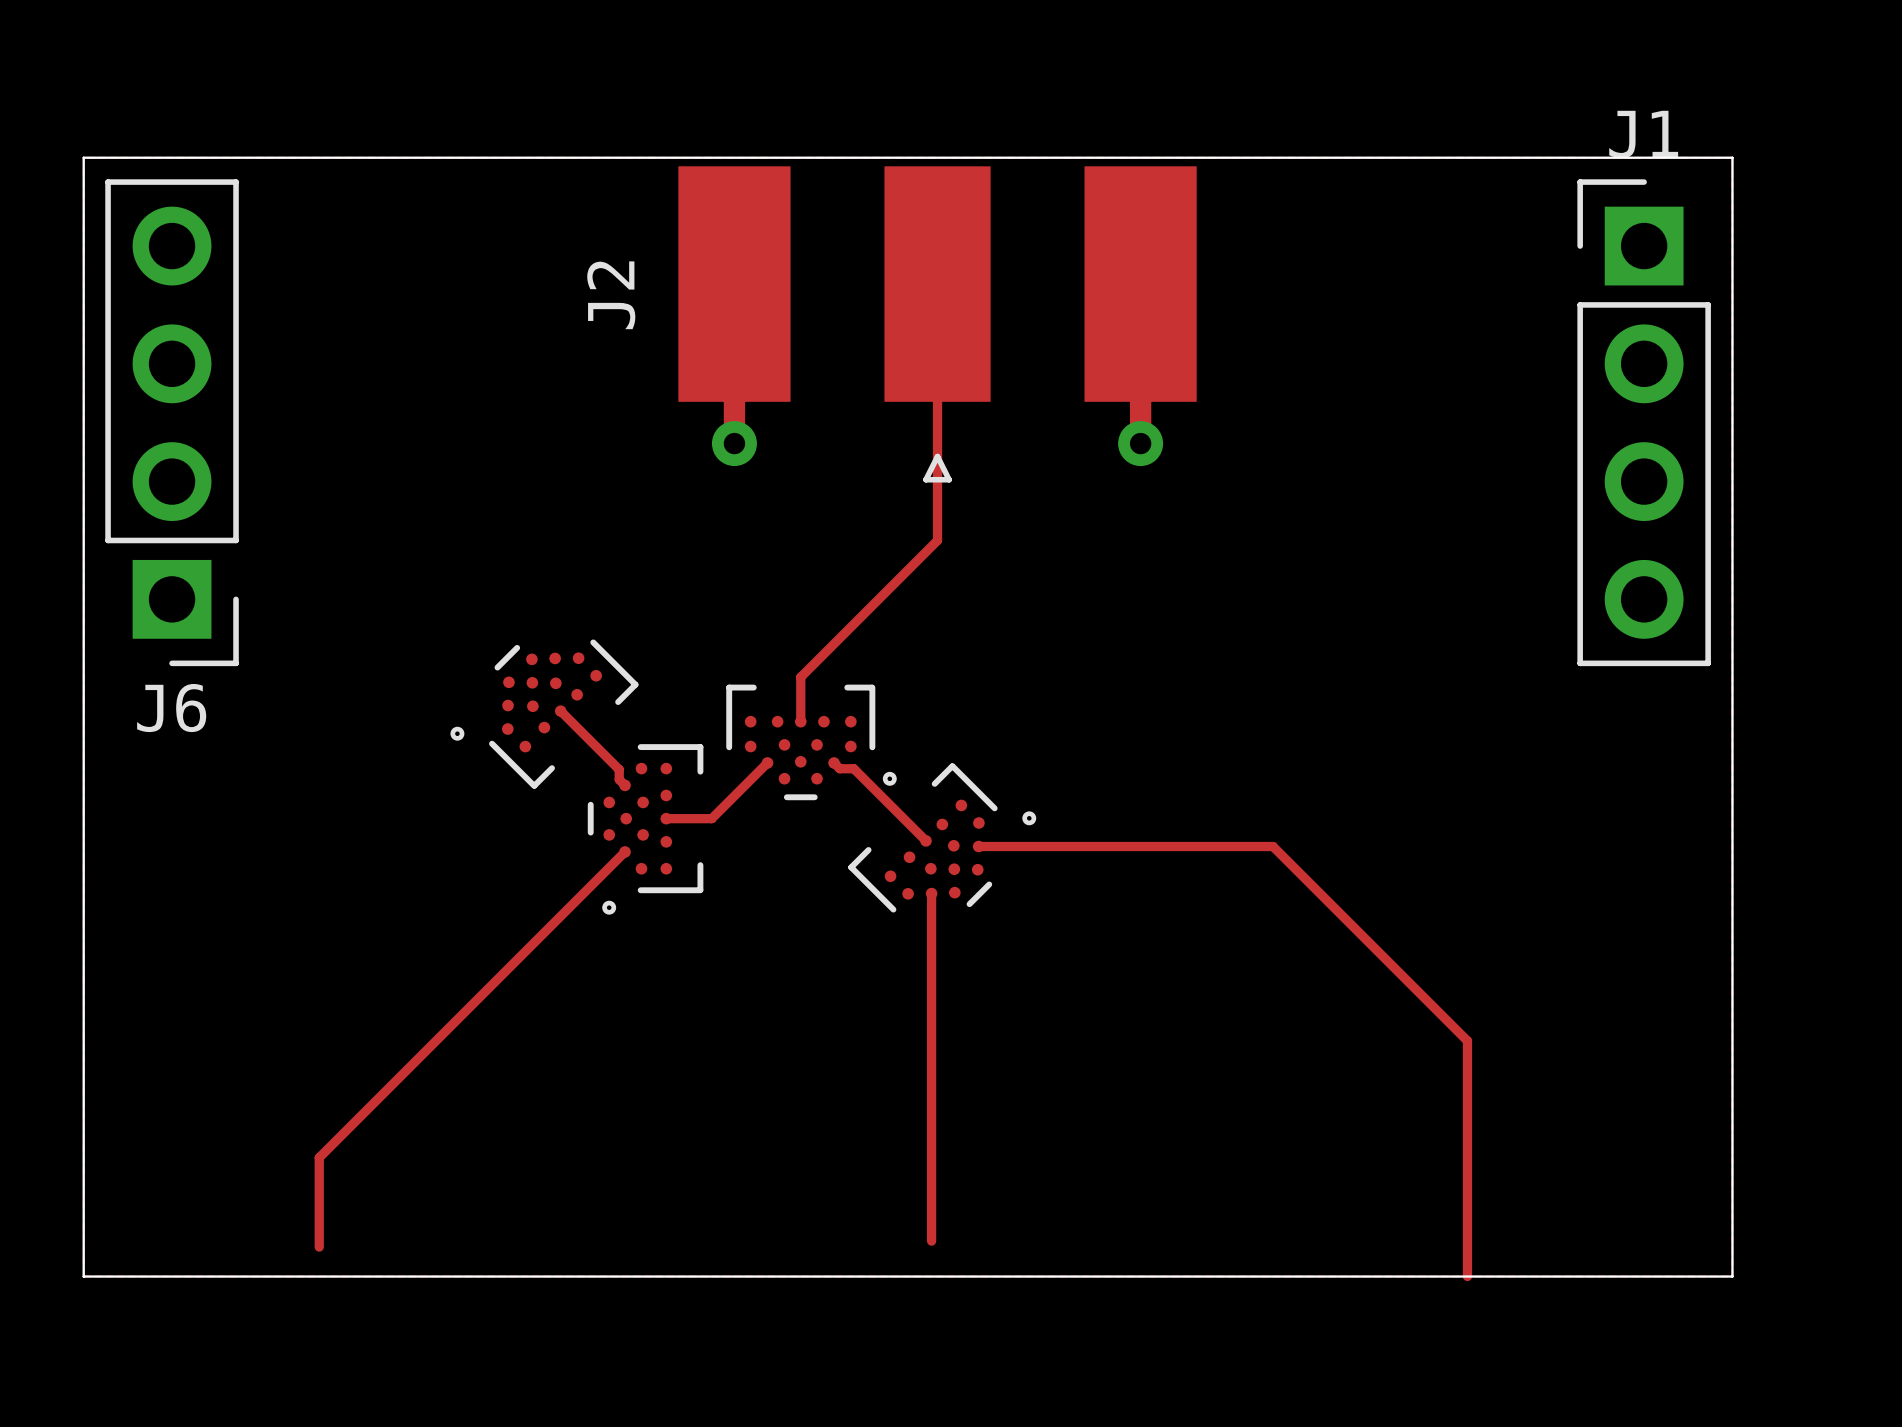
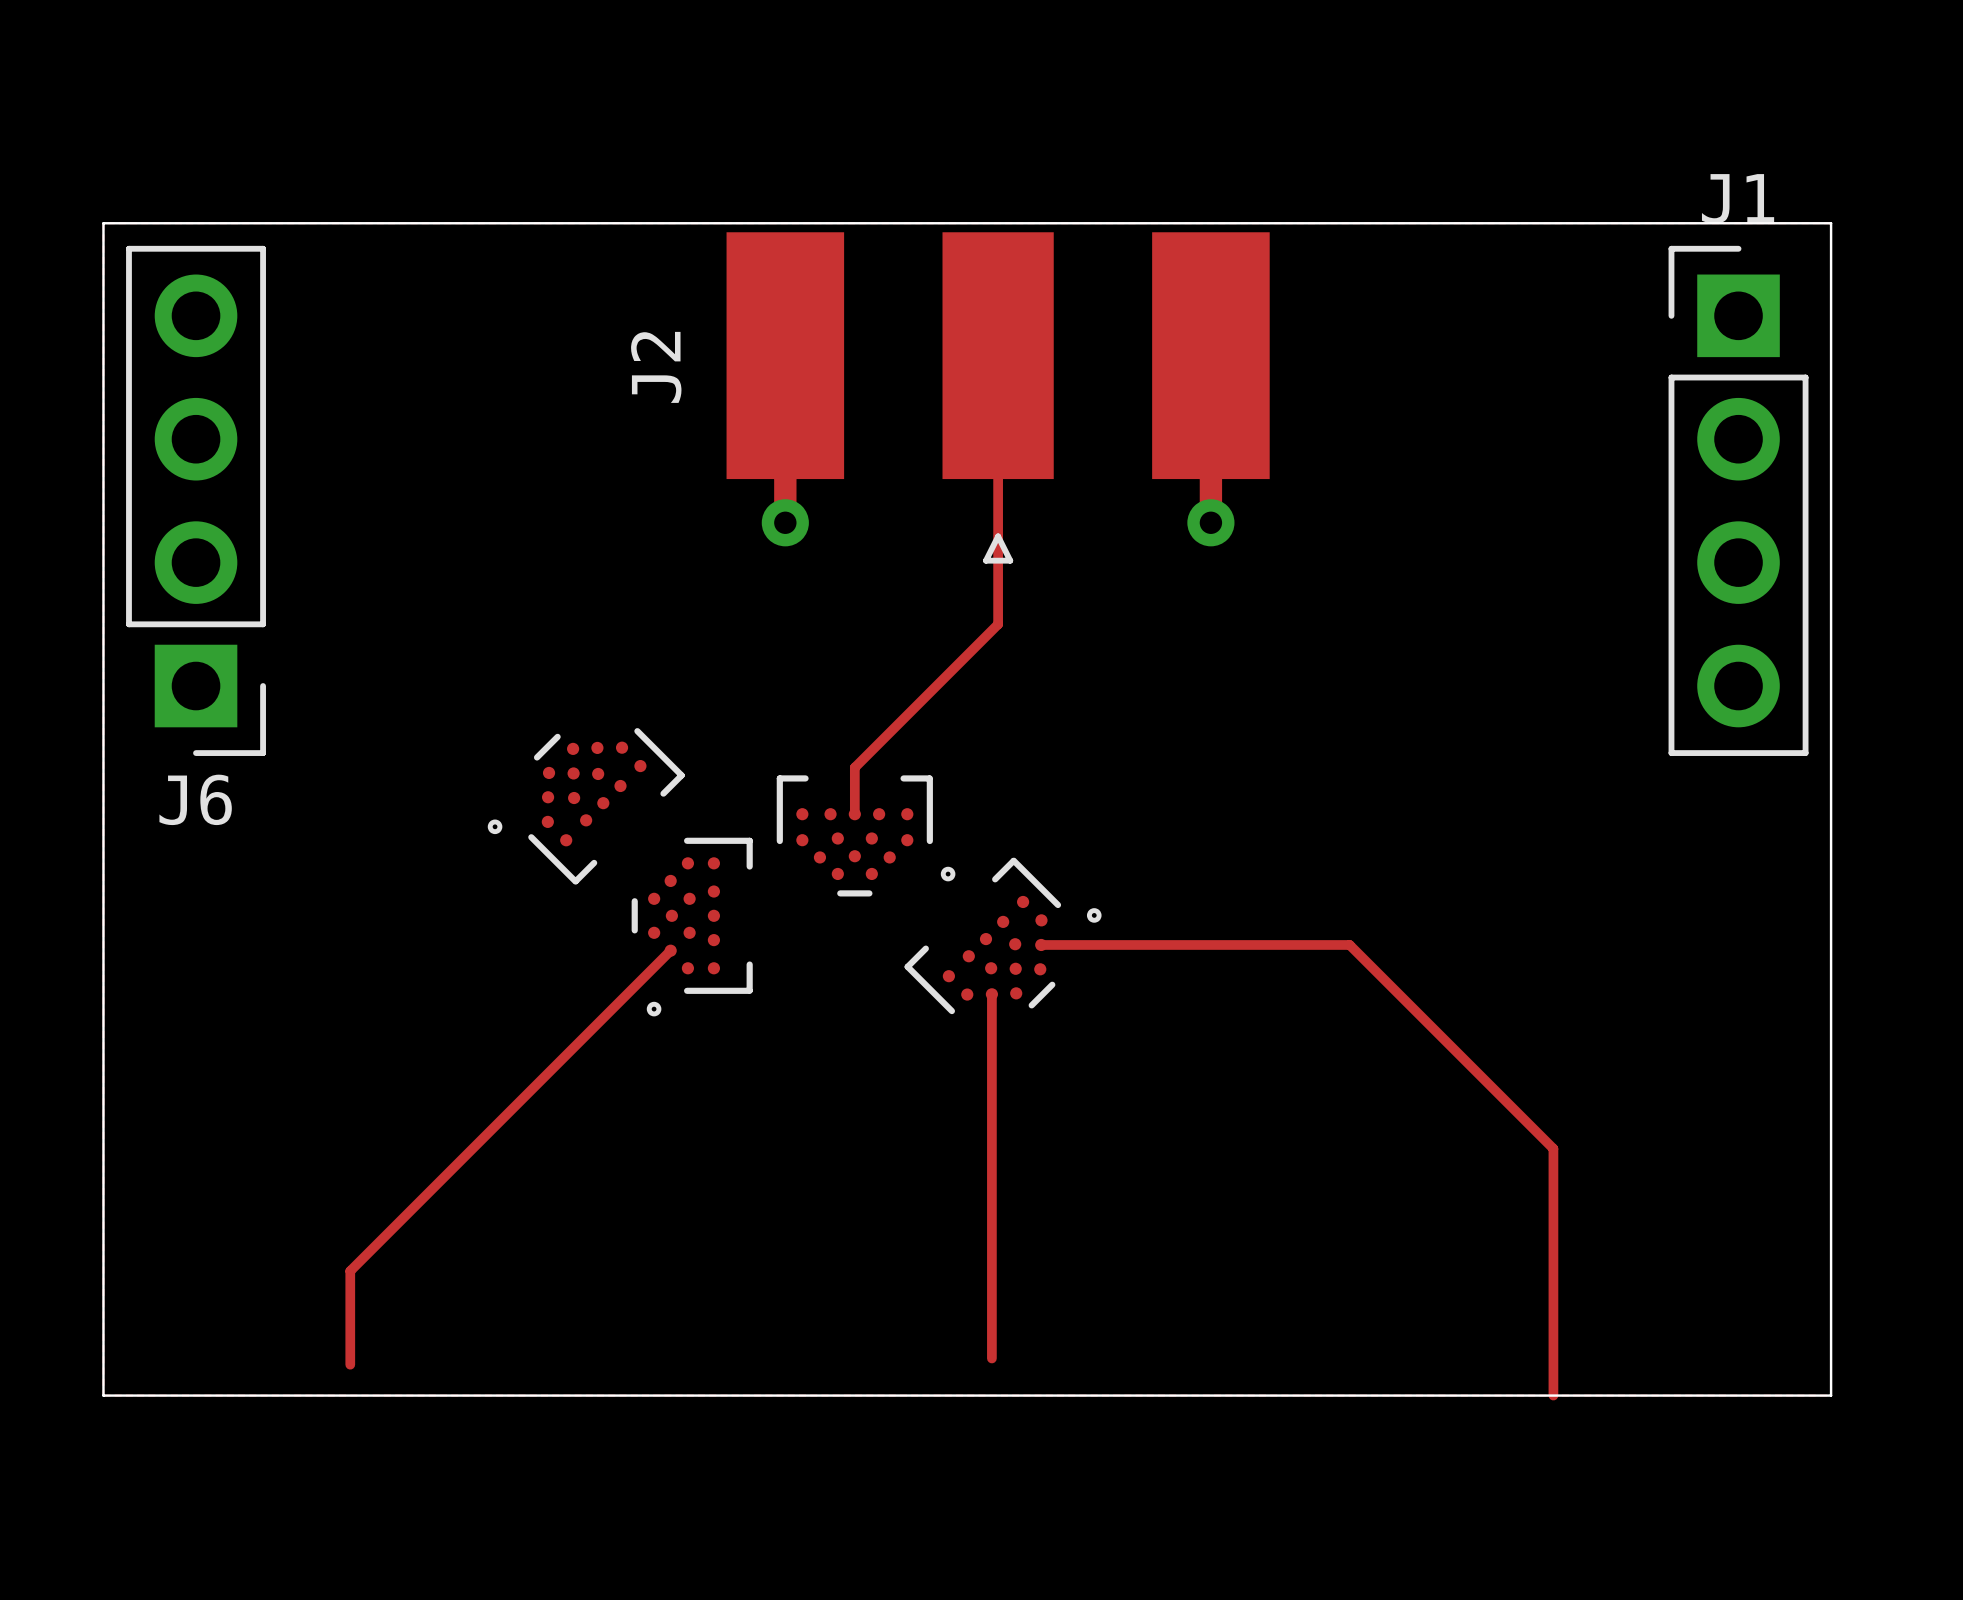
track: (560, 711) (619, 769) (619, 779) (625, 785) -> none
track: (767, 762) (711, 818) (666, 818) -> none
track: (834, 762) (839, 768) (853, 768) (925, 840) -> none

